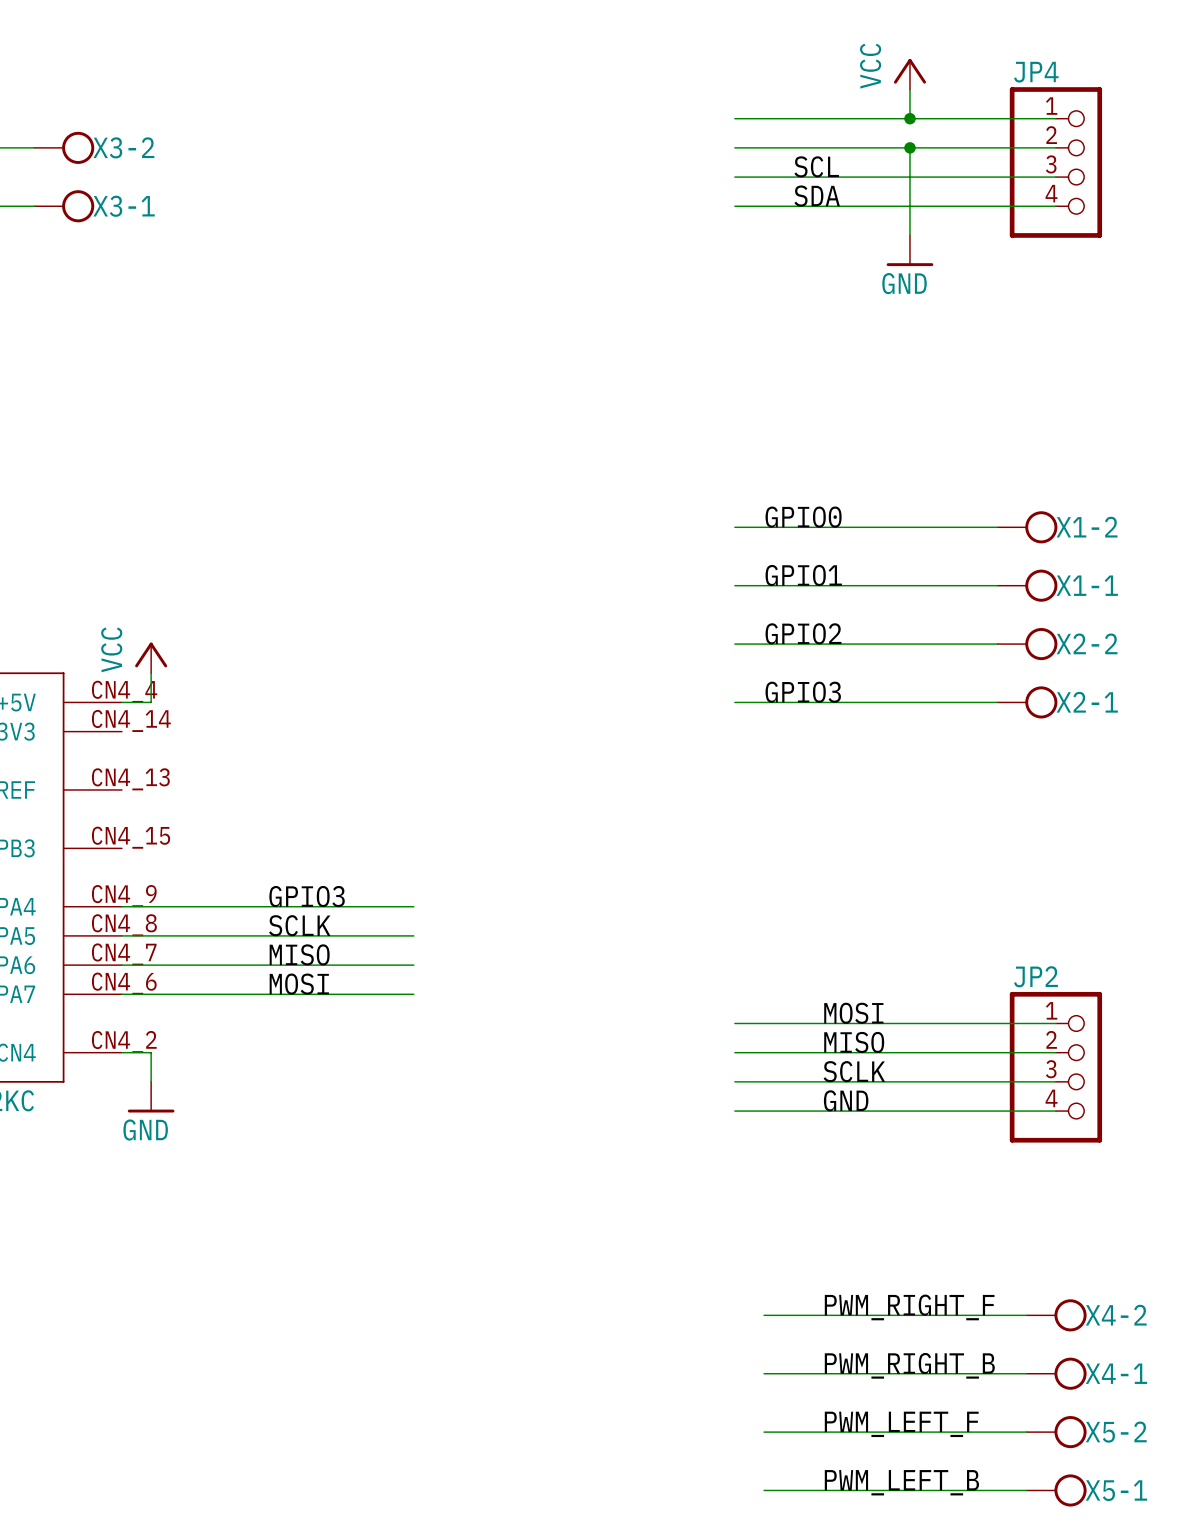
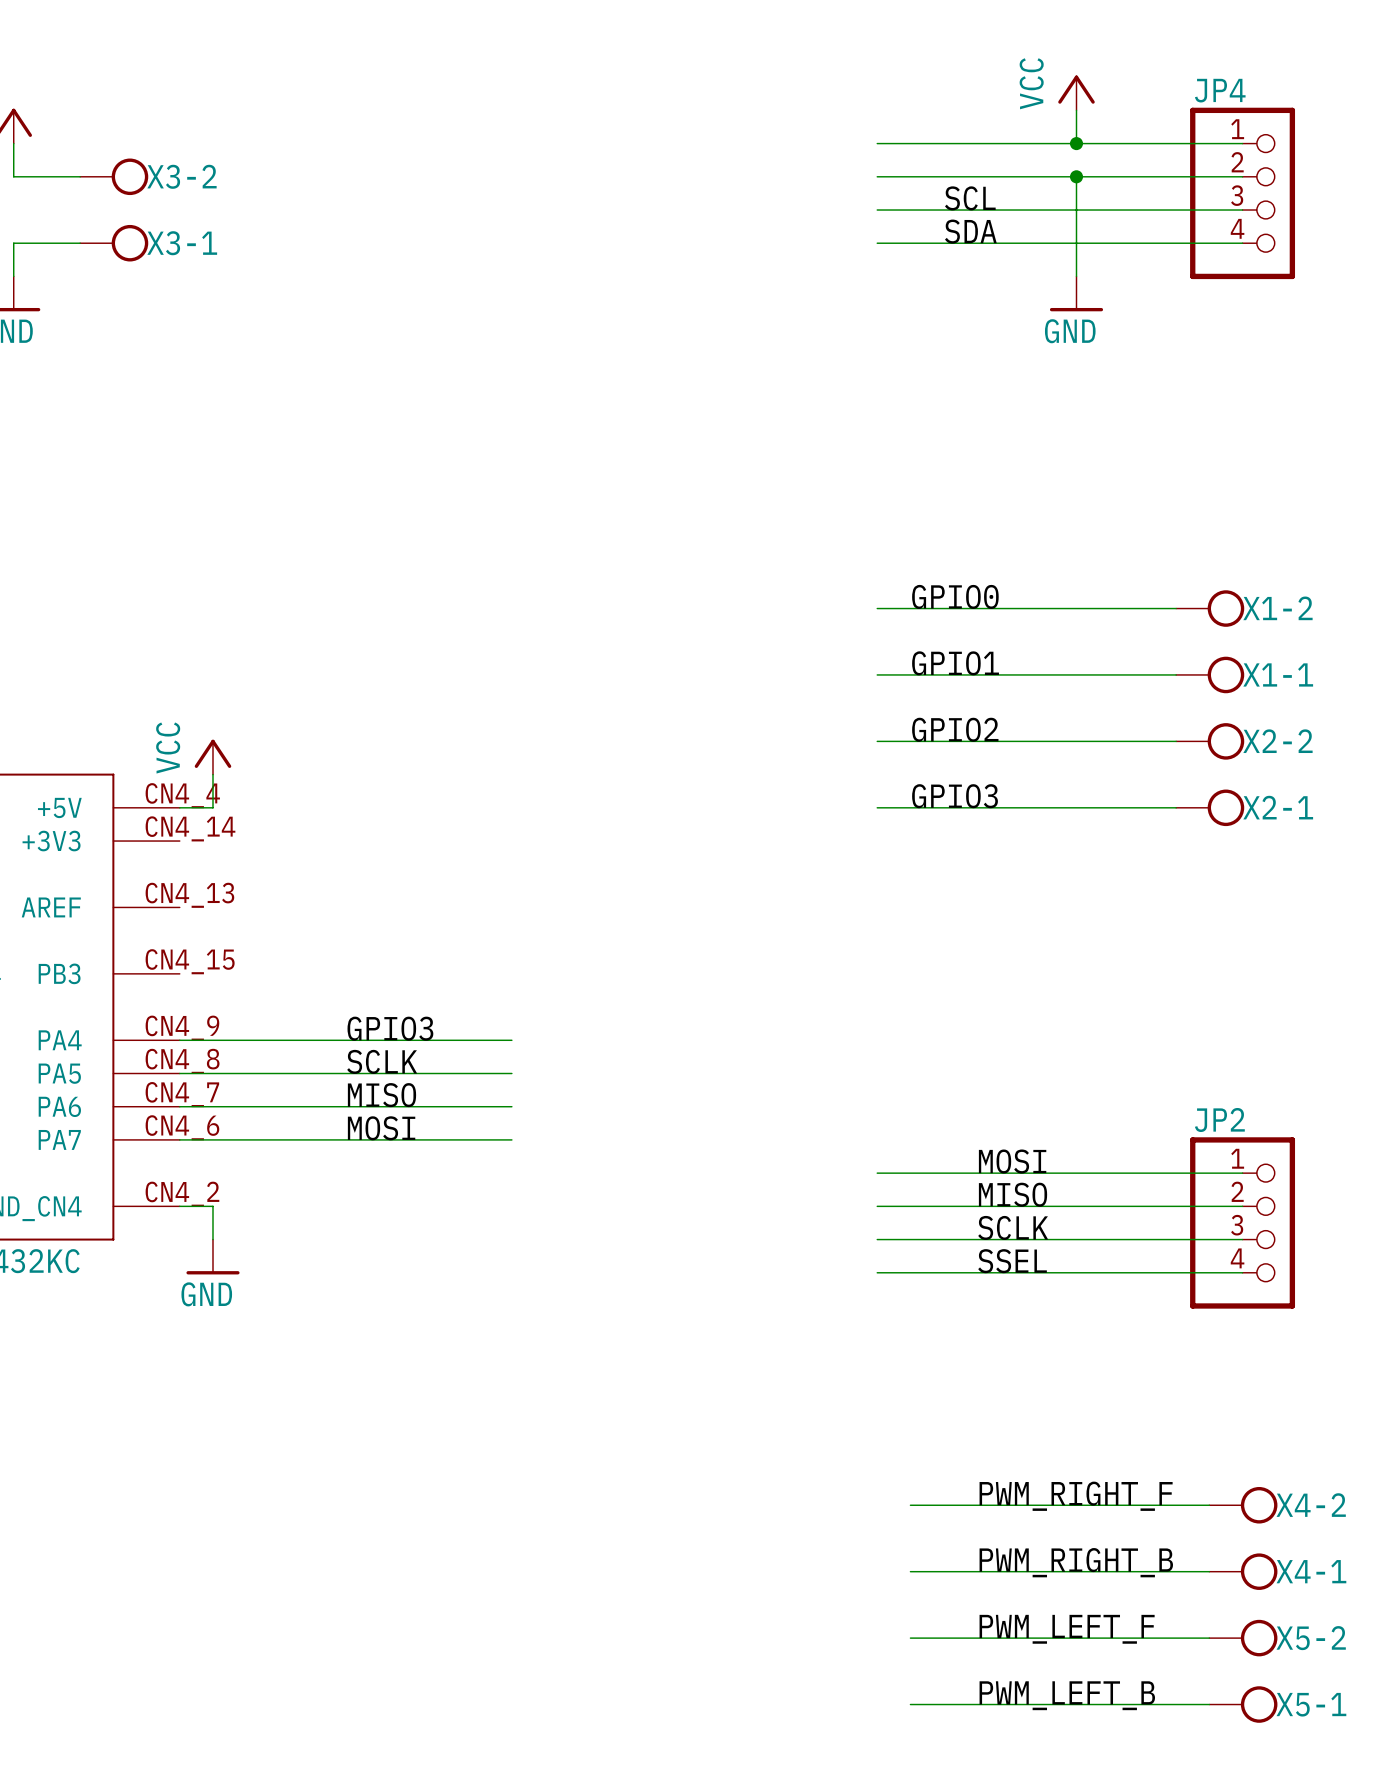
label: GND (846, 1100) -> SSEL (1012, 1261)

